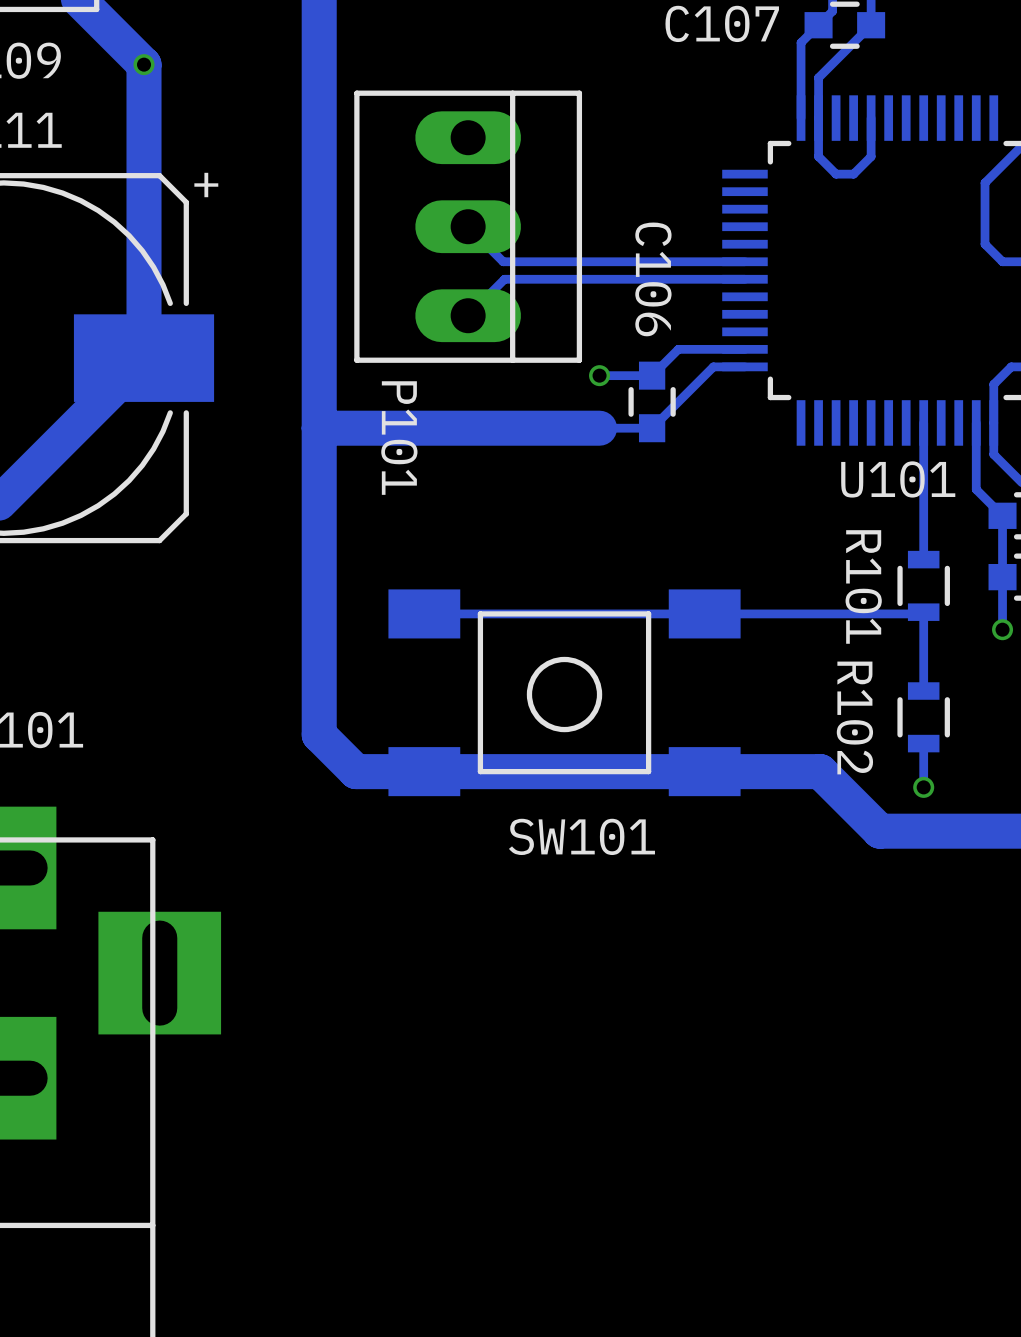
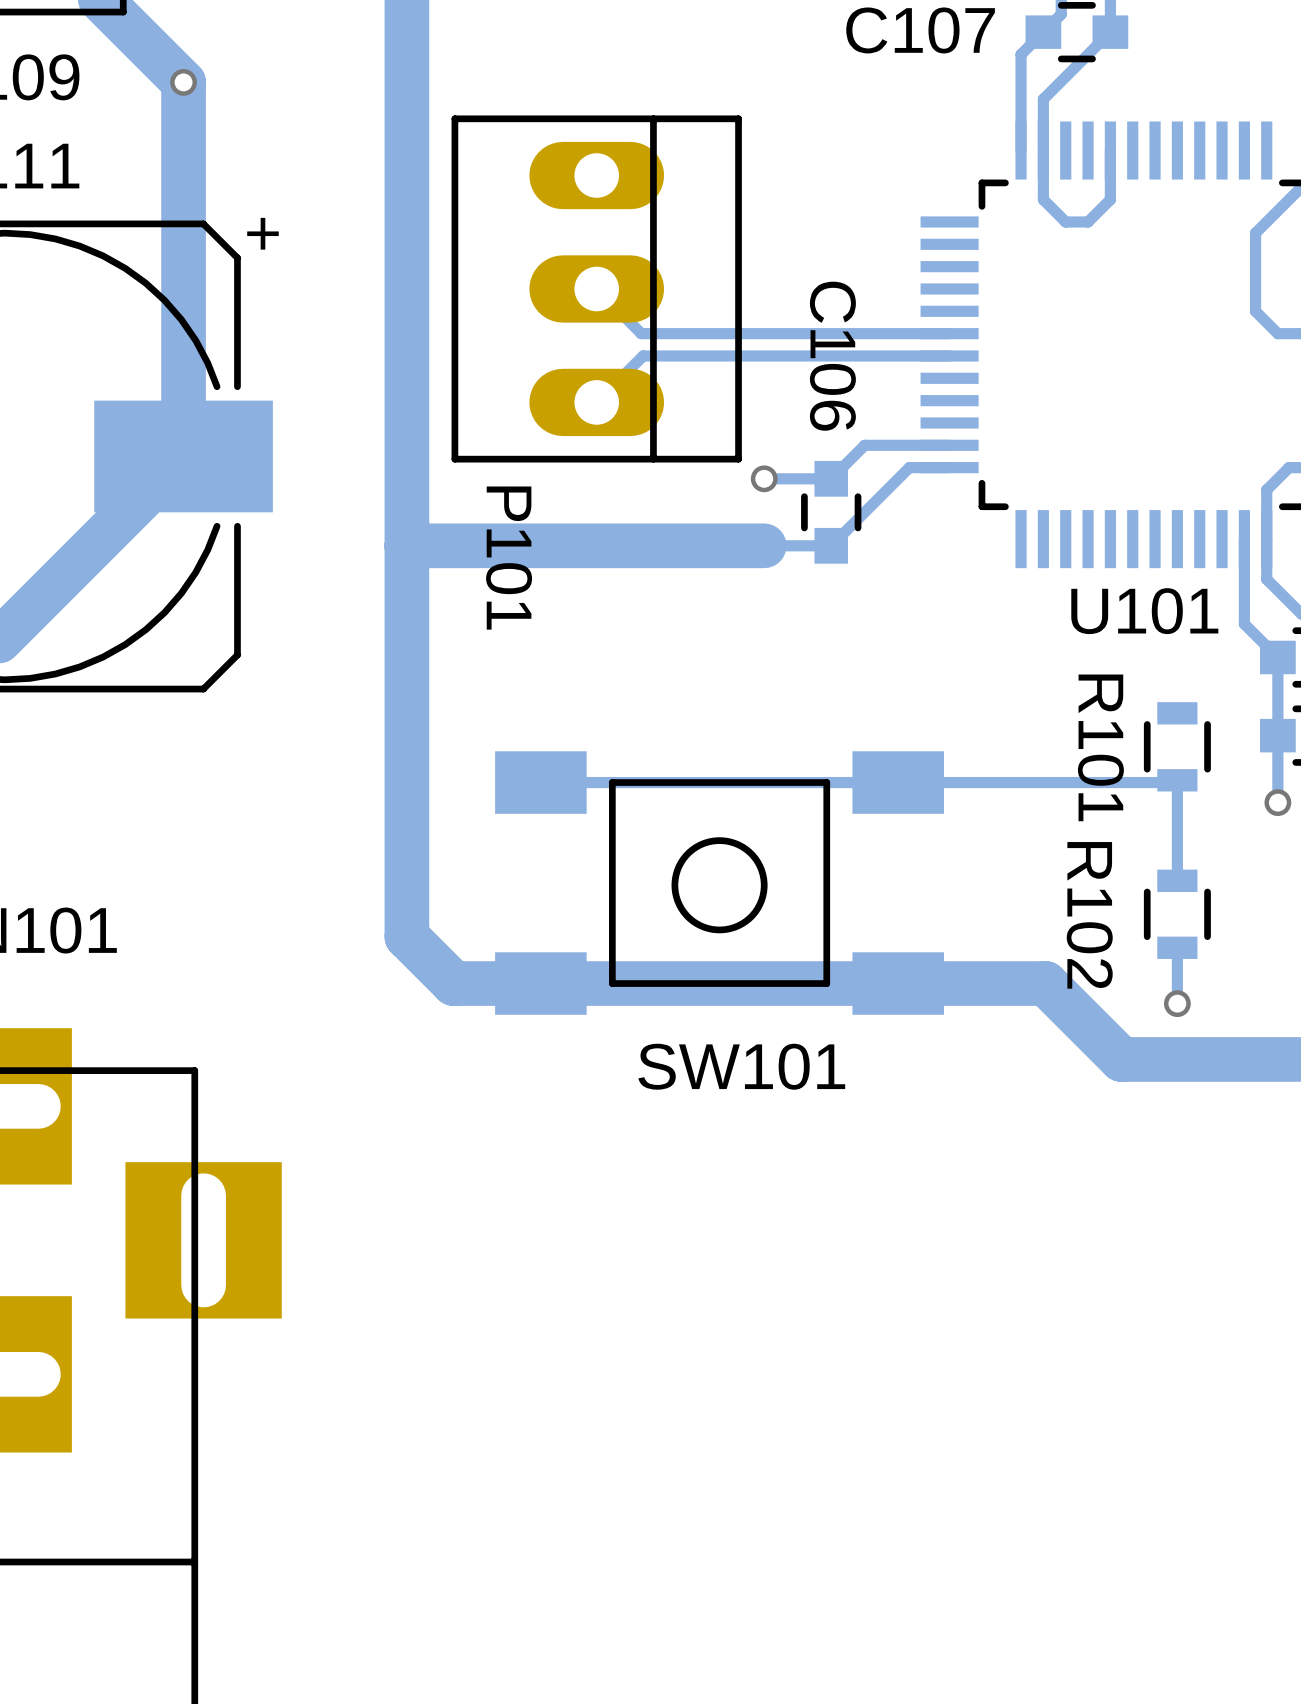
bottom track: (923, 422) (923, 559) -> none

